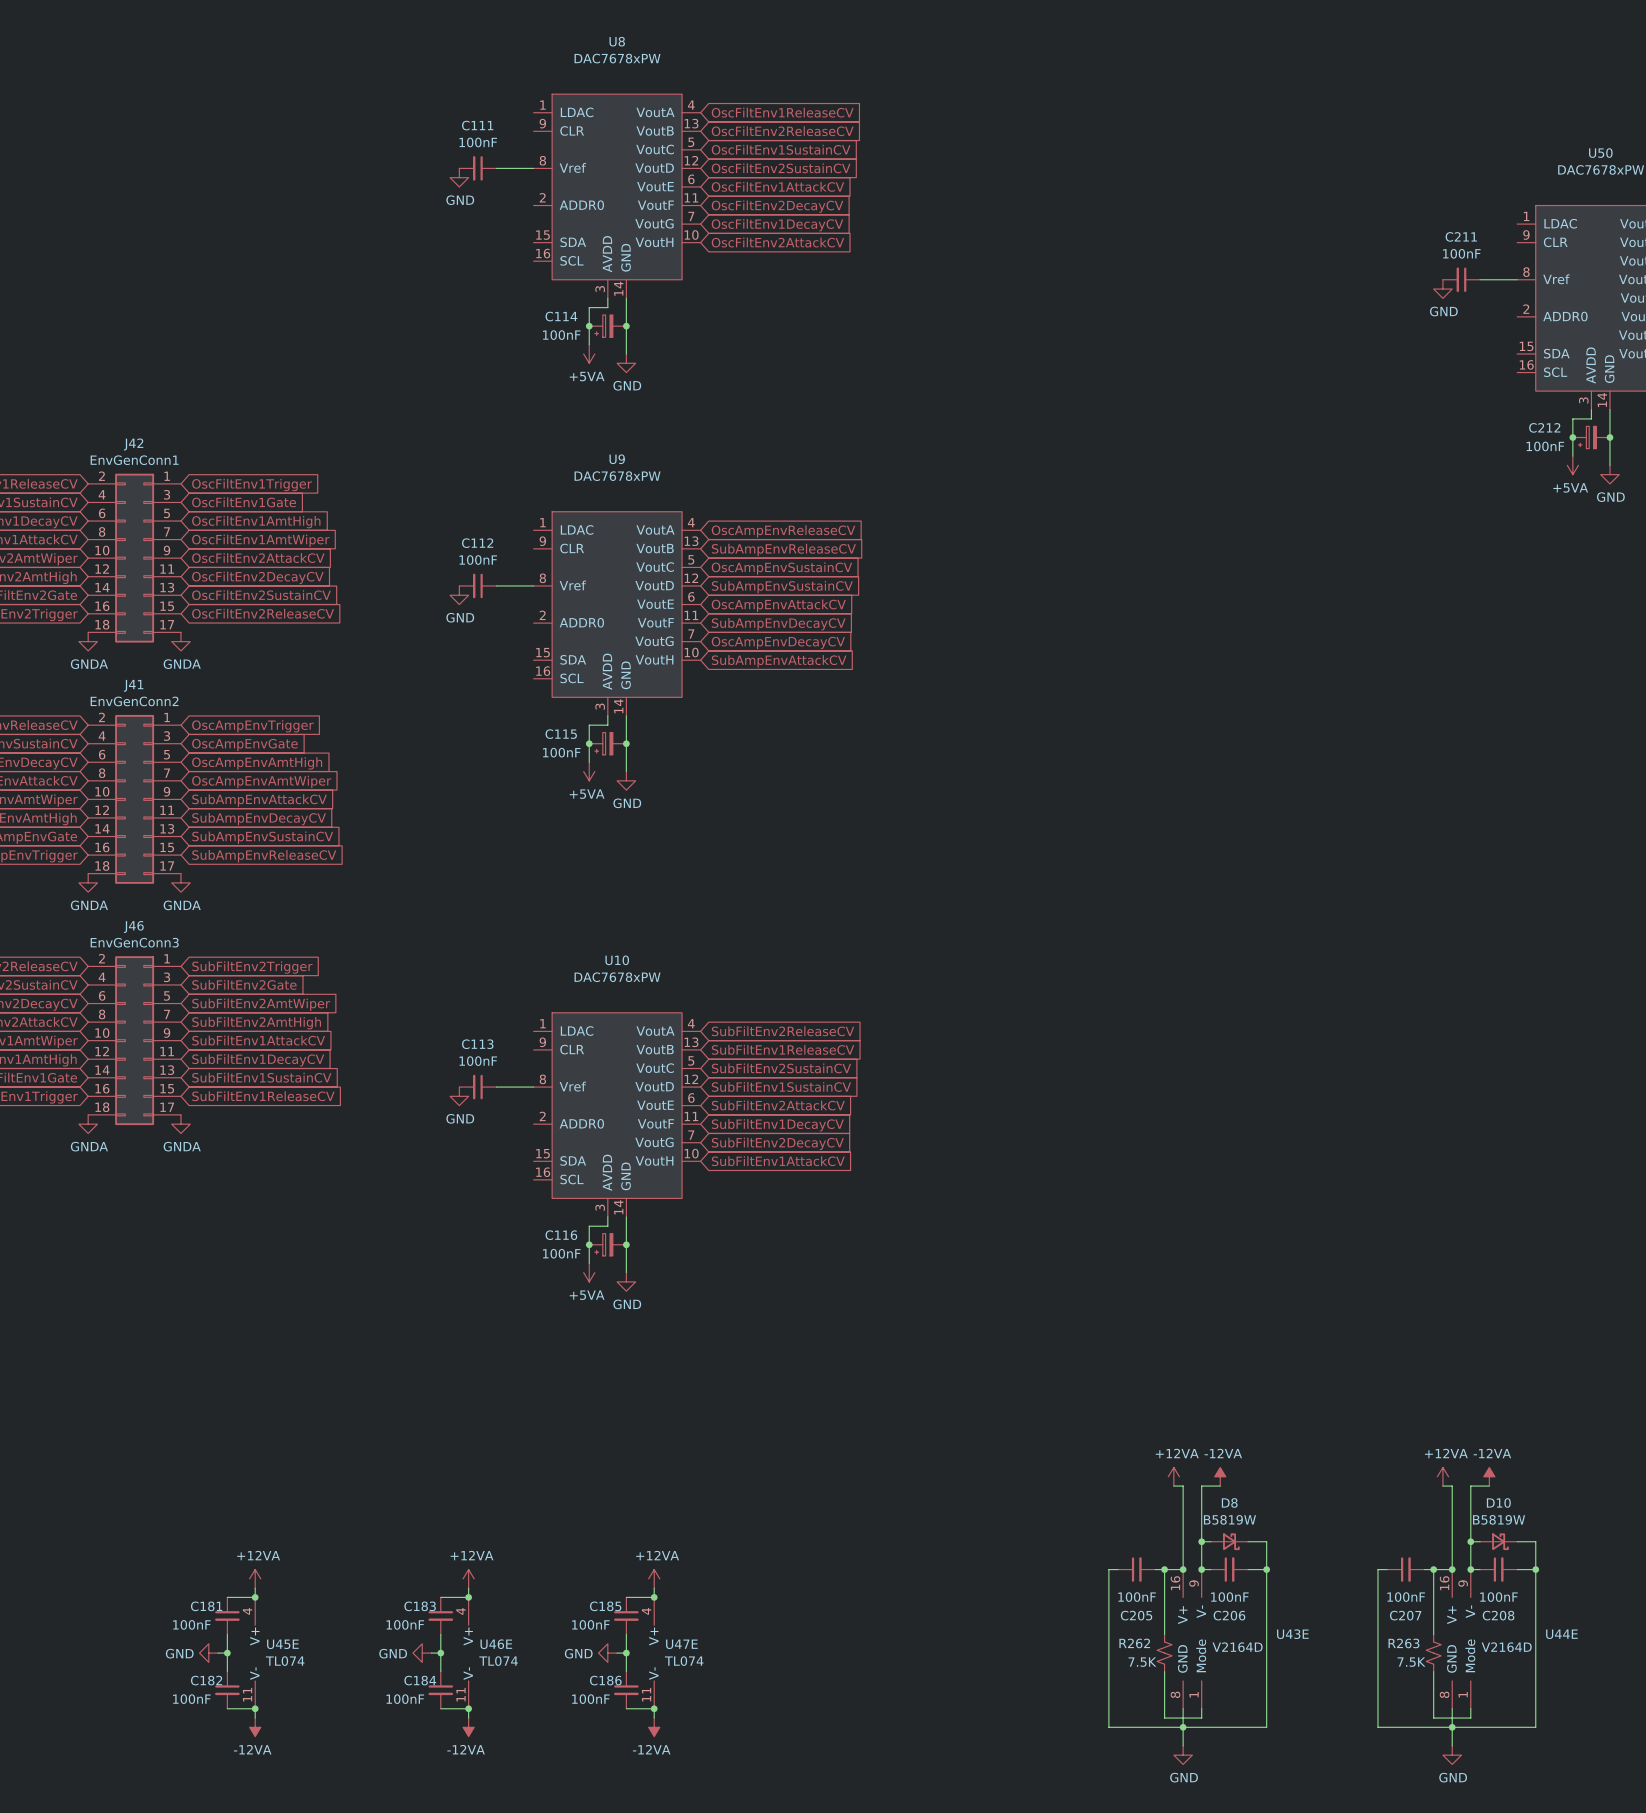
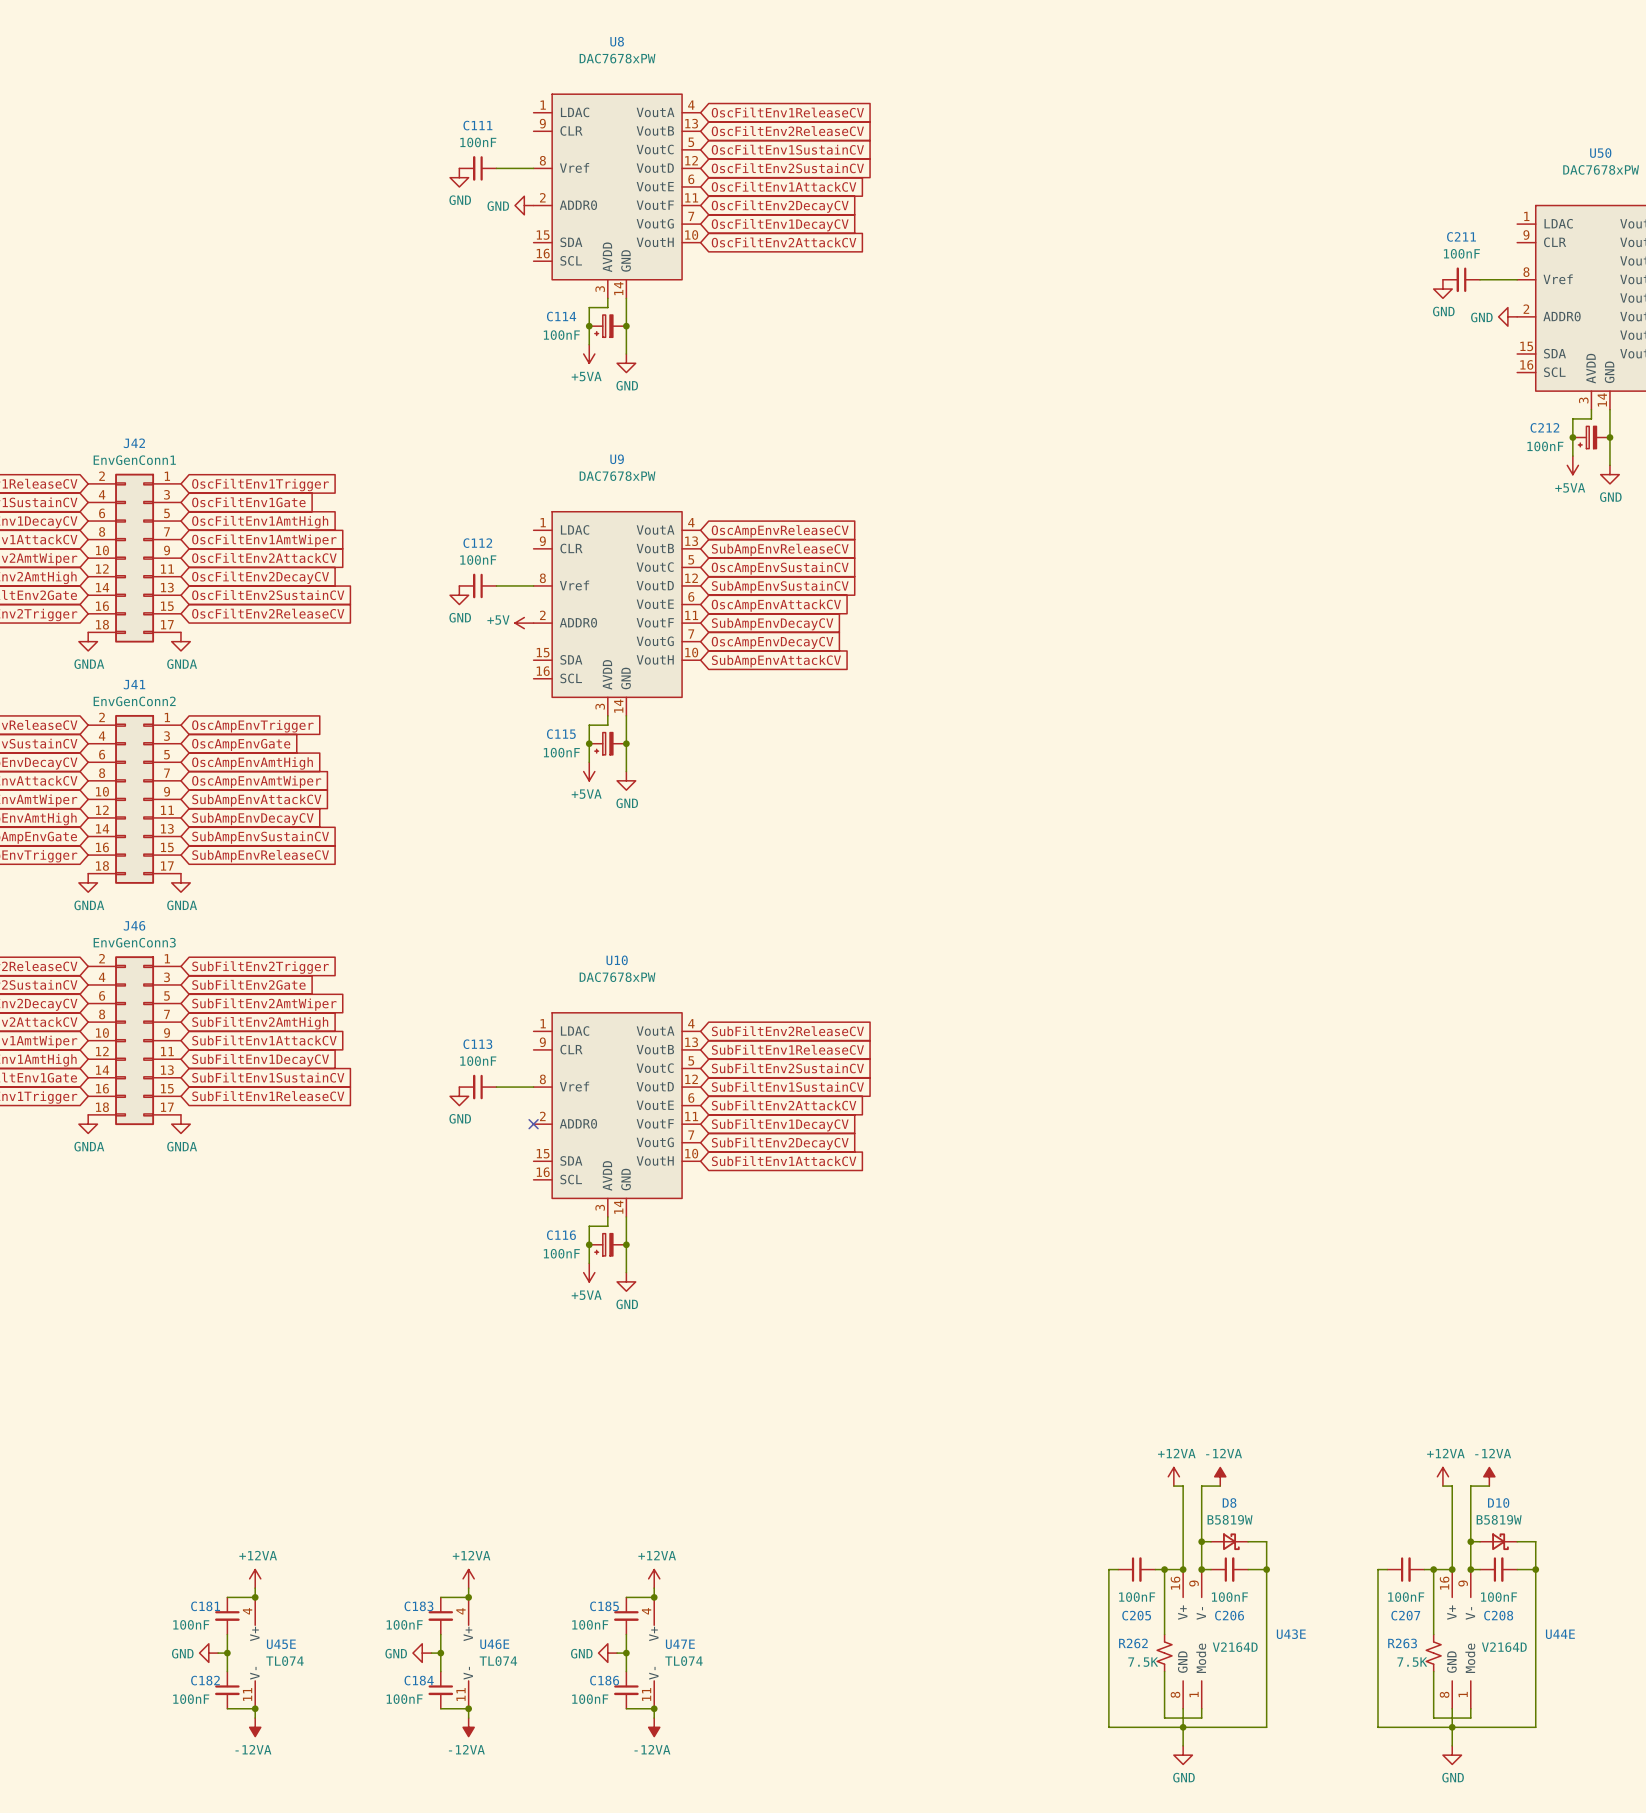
power symbol: none -> GND (524, 205)
power symbol: none -> GND (1507, 316)
power symbol: none -> +5V (524, 623)
no-connect mark: none -> (533, 1124)

